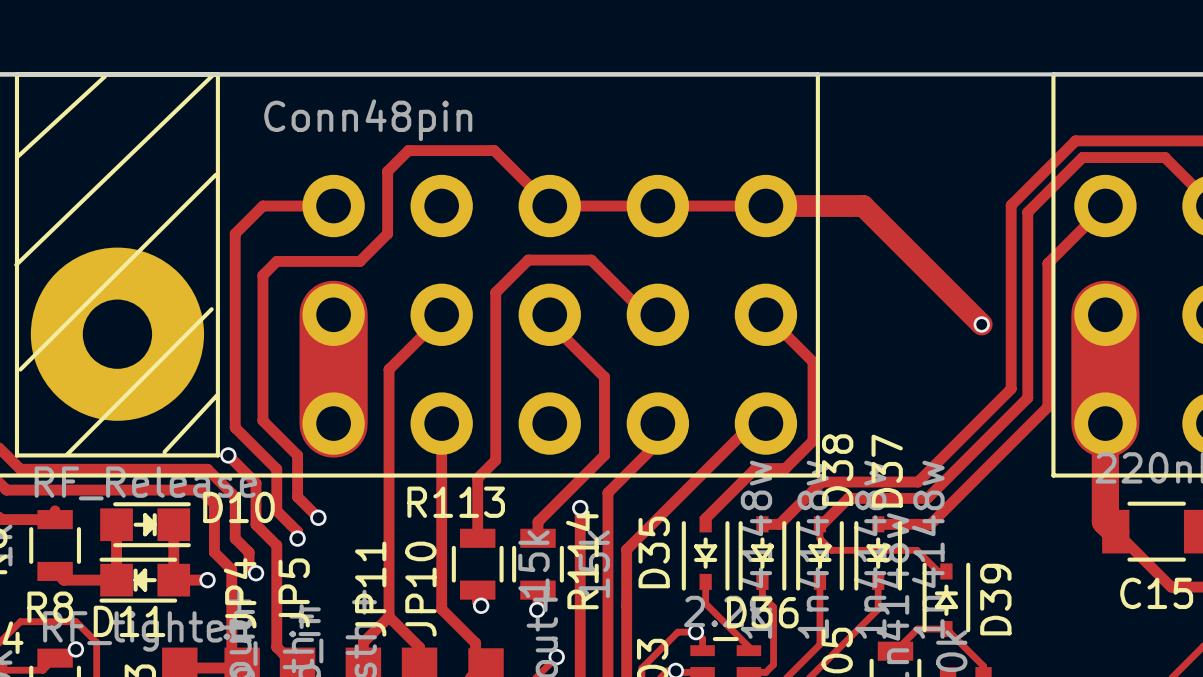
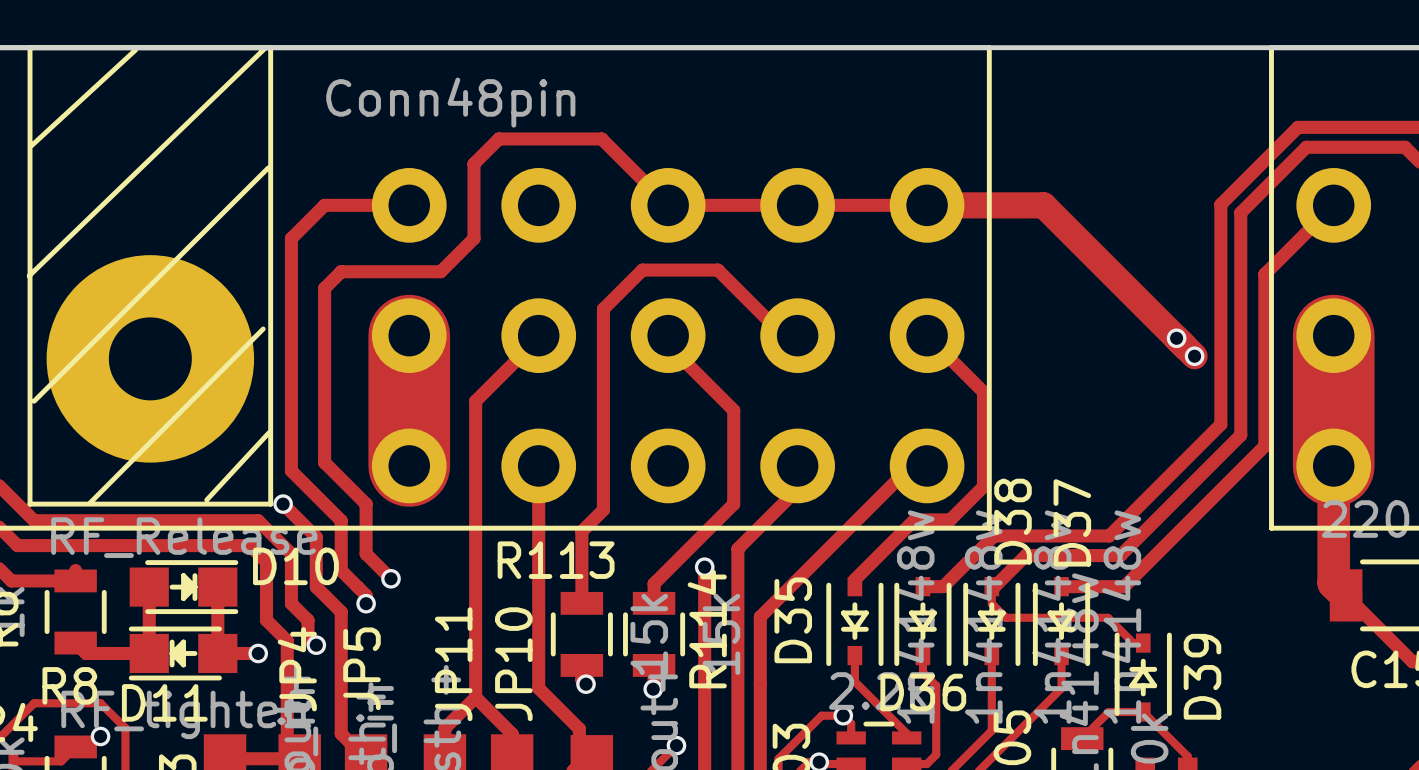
via: none -> (1176, 338)
via: (981, 324) -> none
via: none -> (1194, 356)

